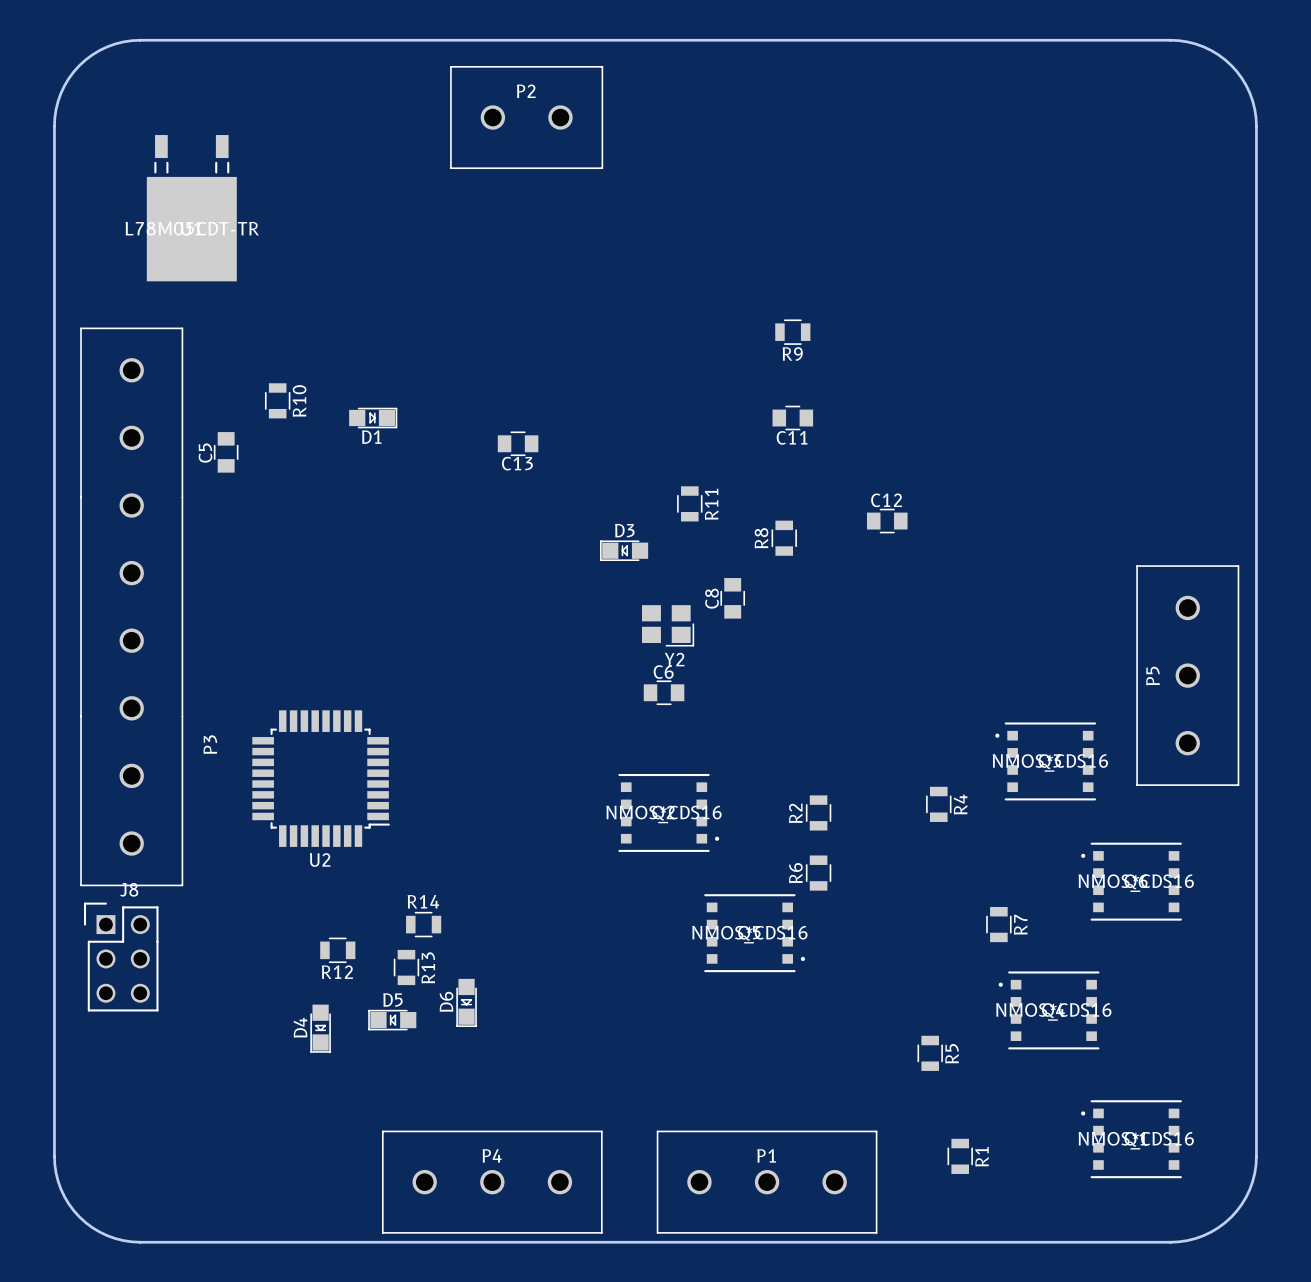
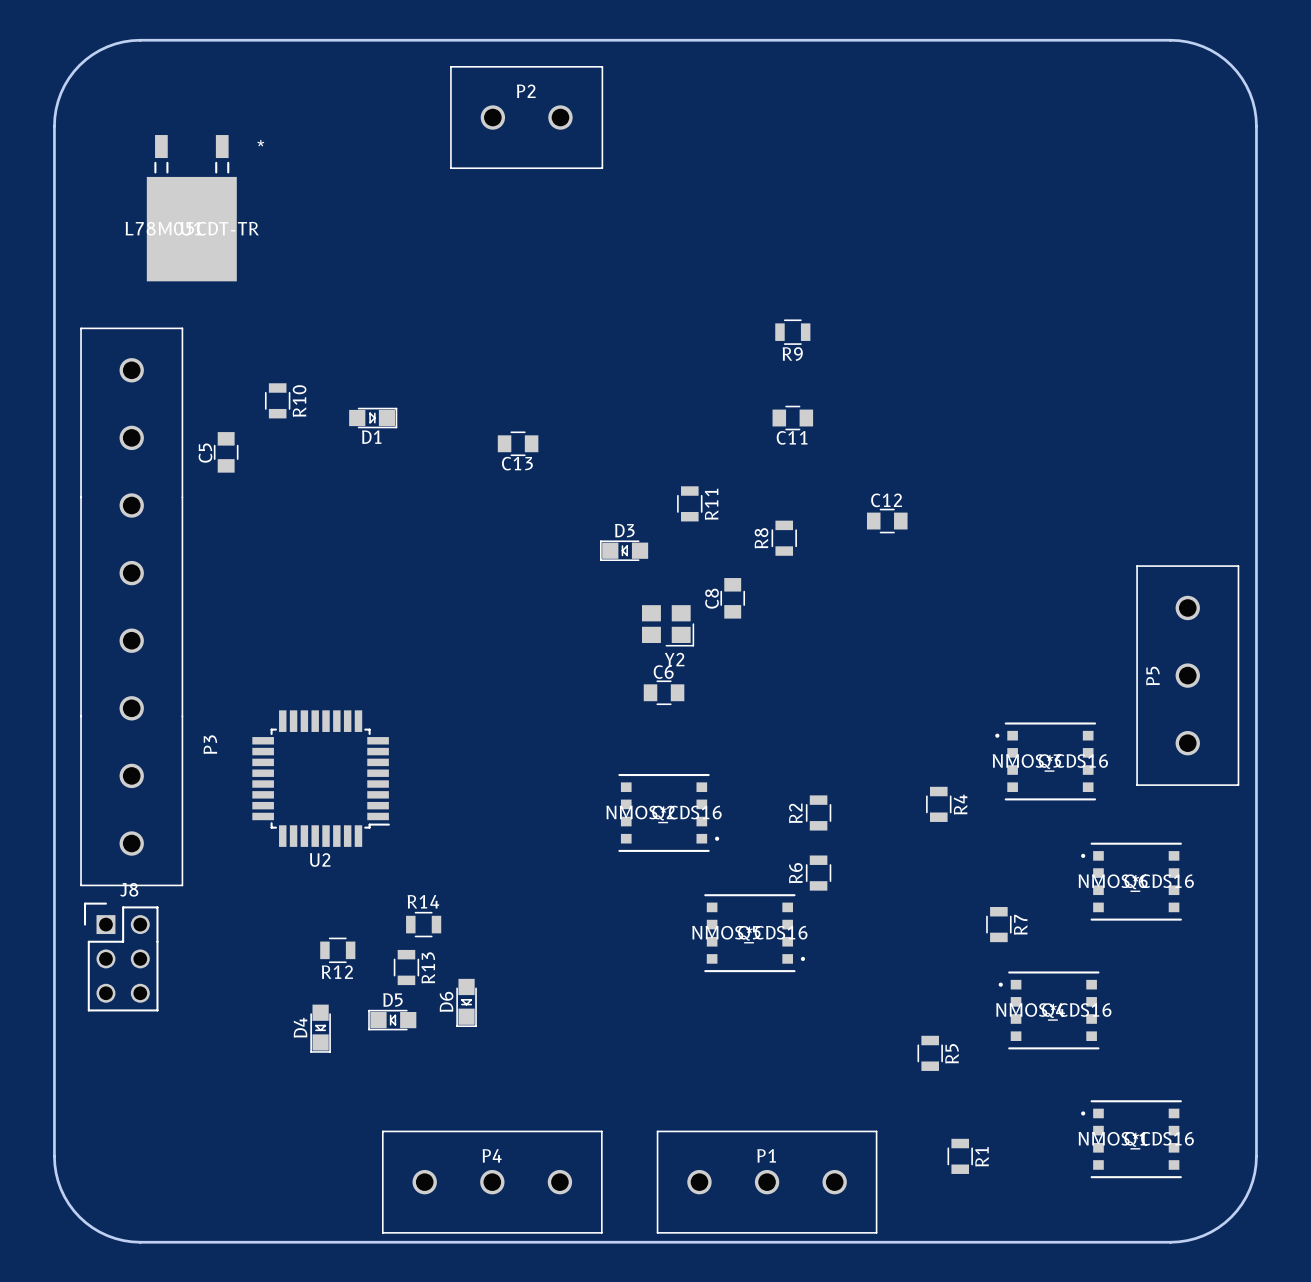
part text: none -> * (260, 143)

